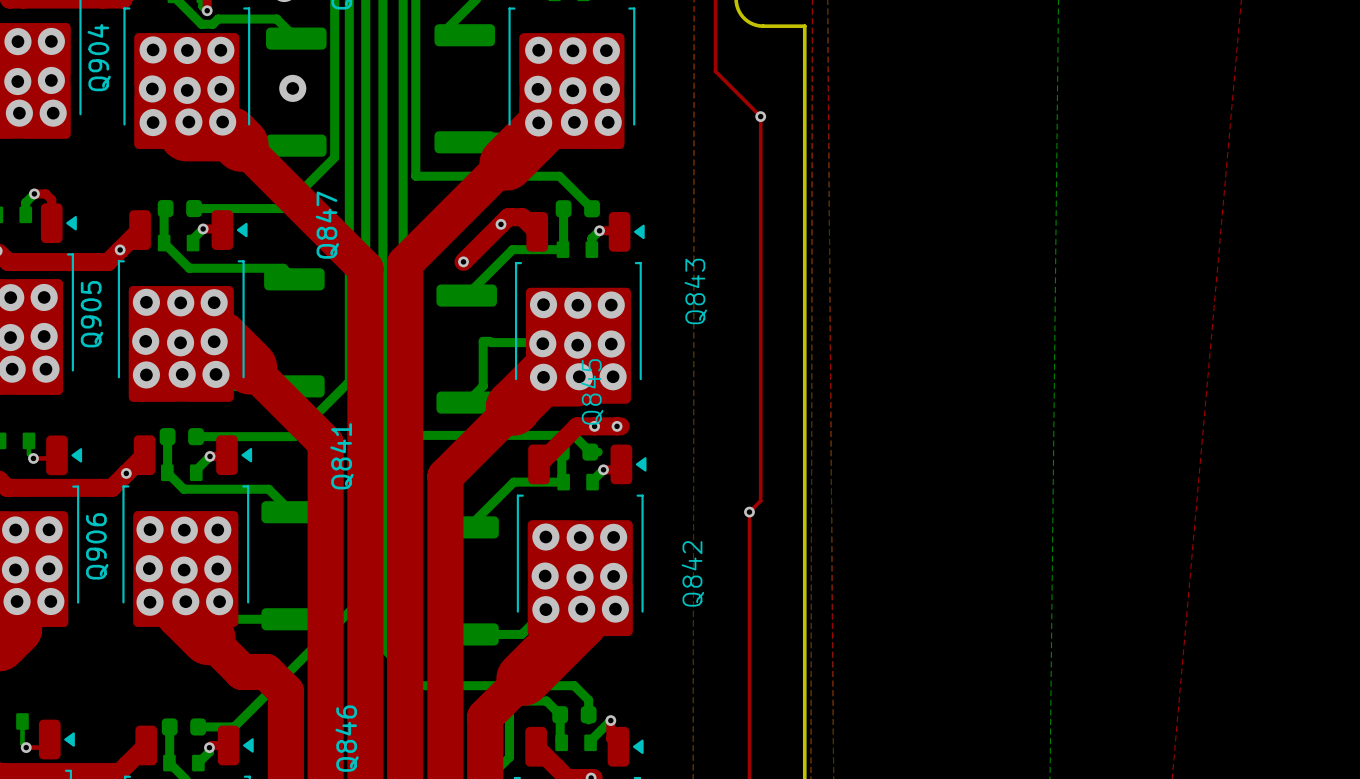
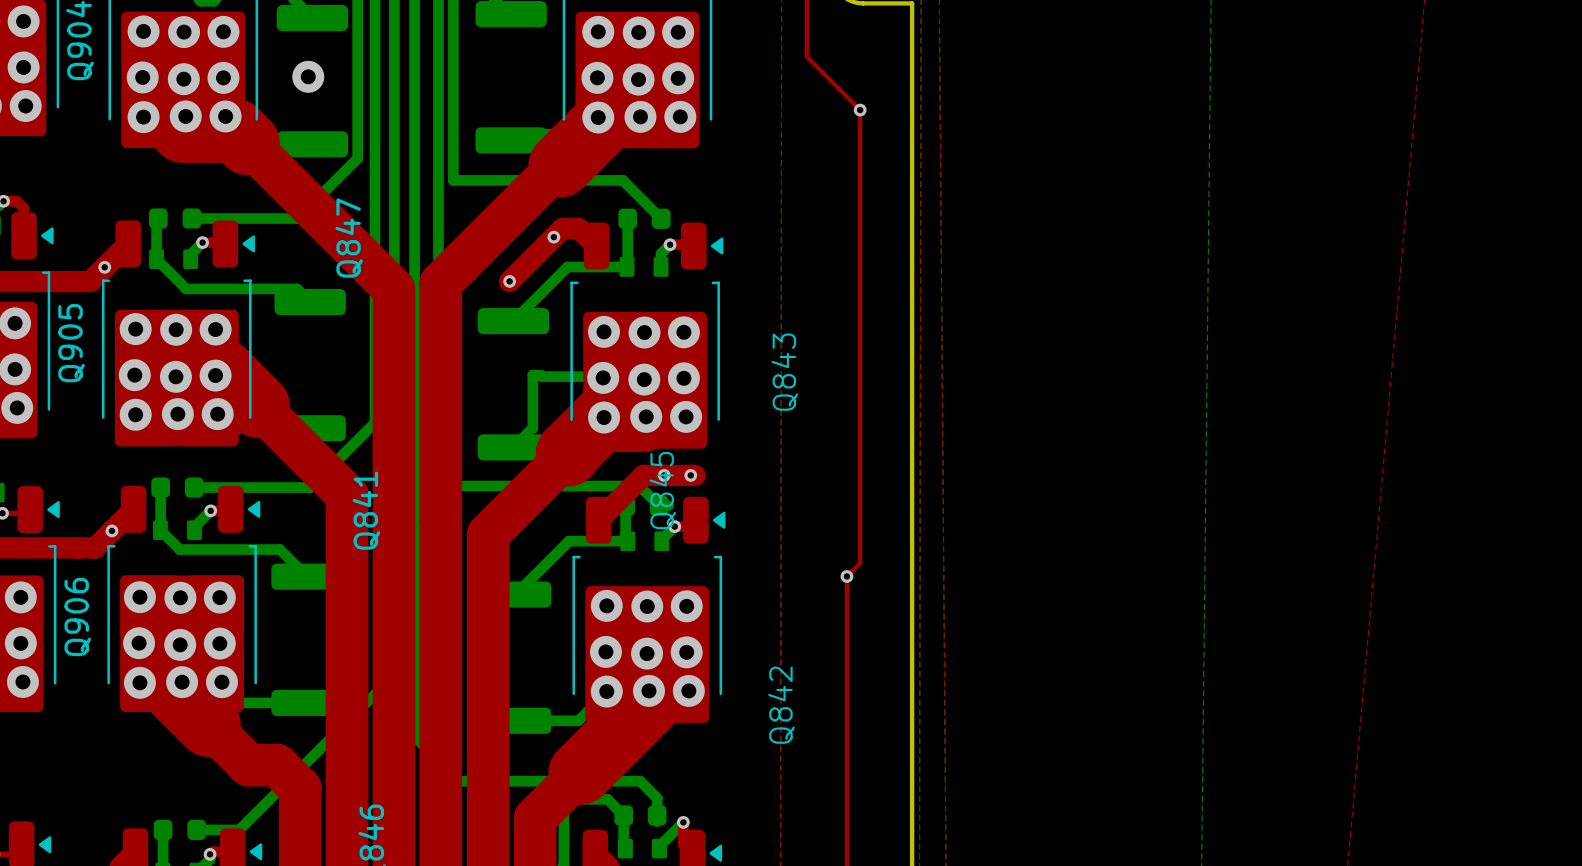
Q843 name position: Q843 (695, 291) -> Q843 (784, 372)
Q845 name position: Q845 (592, 391) -> Q845 (662, 490)
Q842 name position: Q842 (692, 573) -> Q842 (781, 705)

